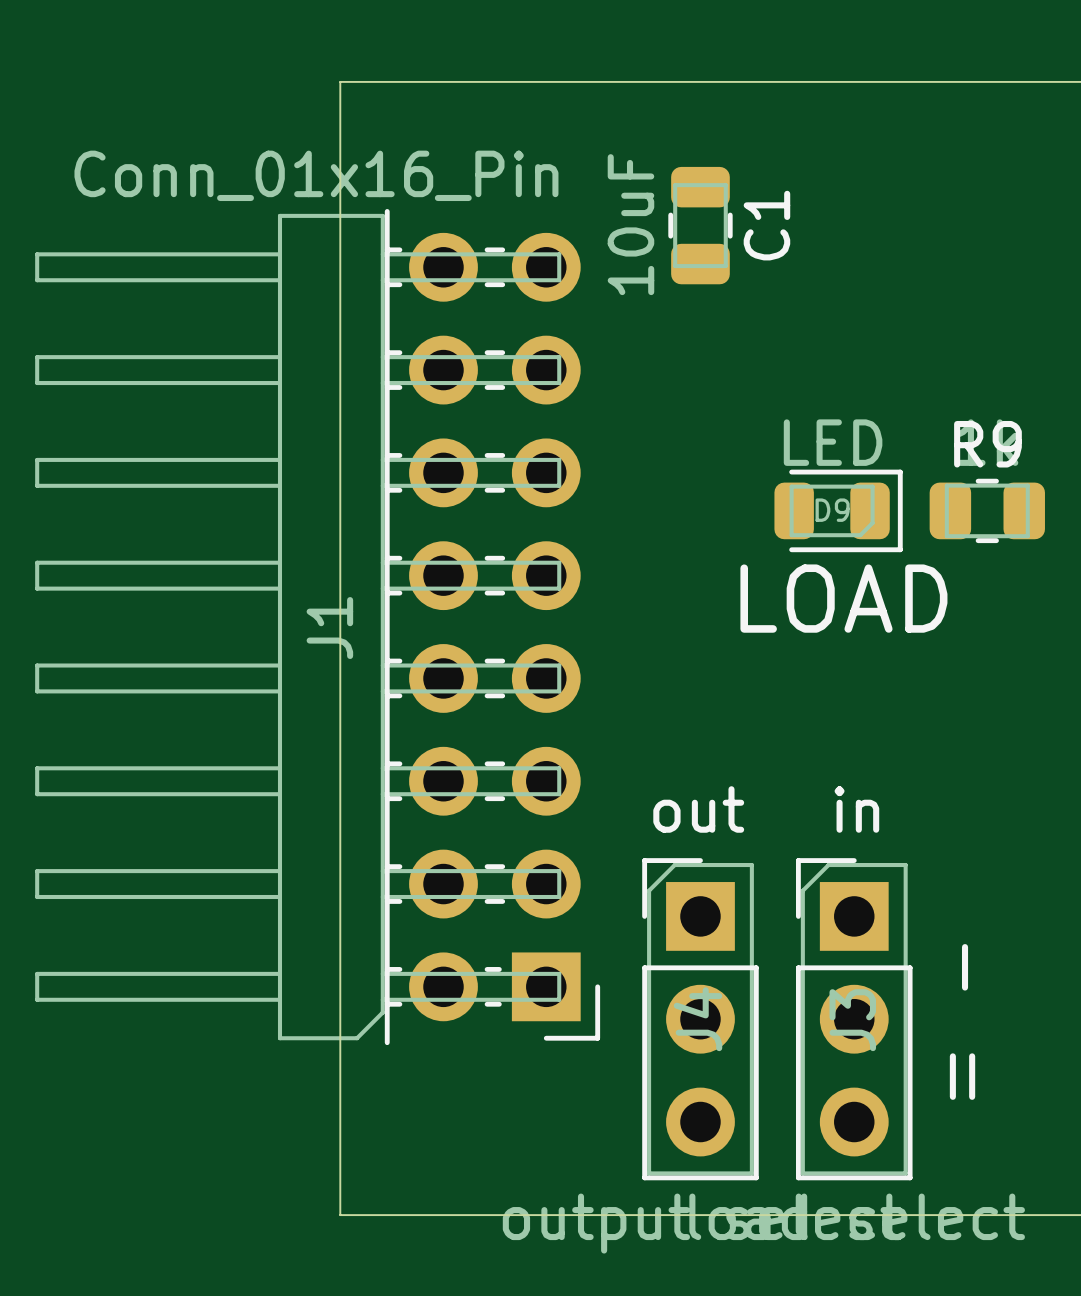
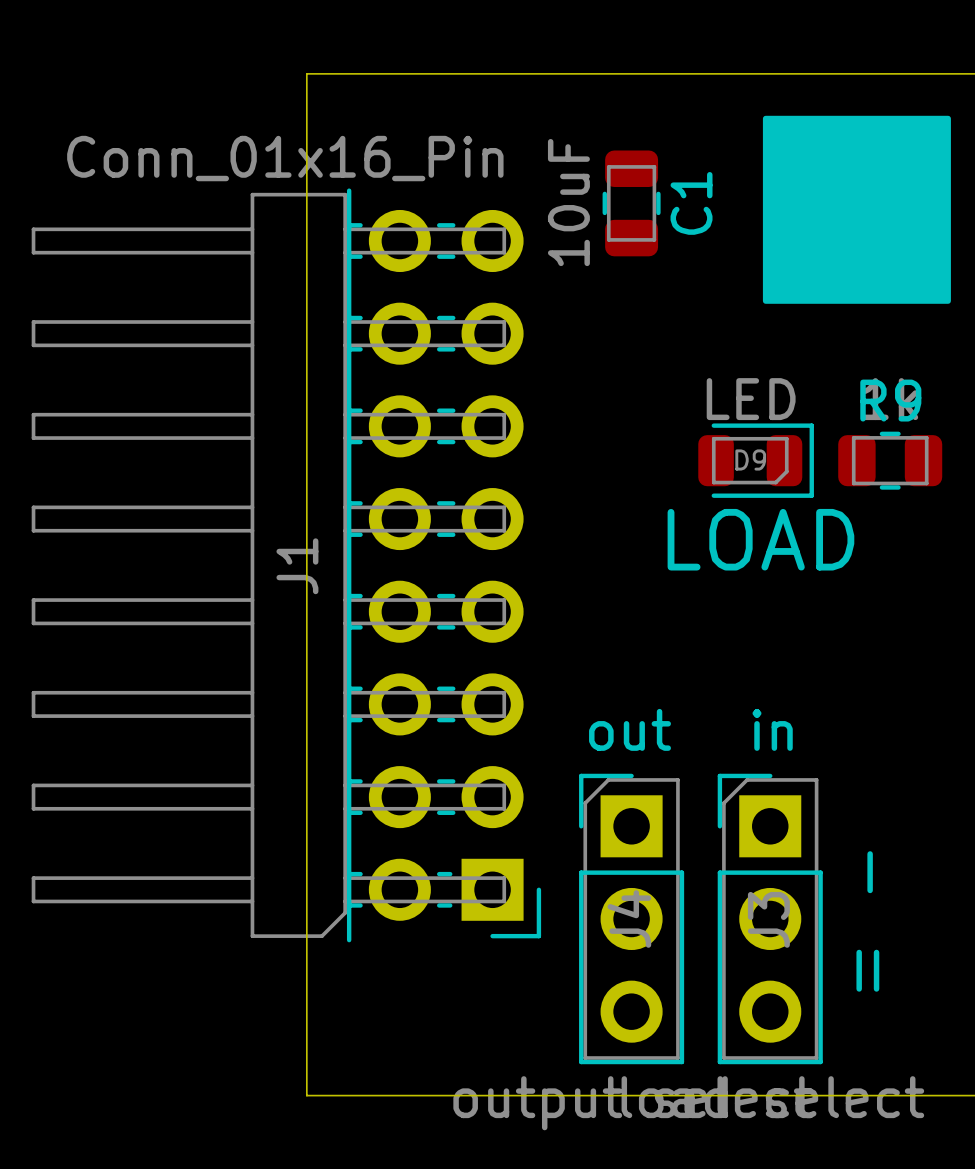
drawing: none -> [762, 115, 951, 304]

